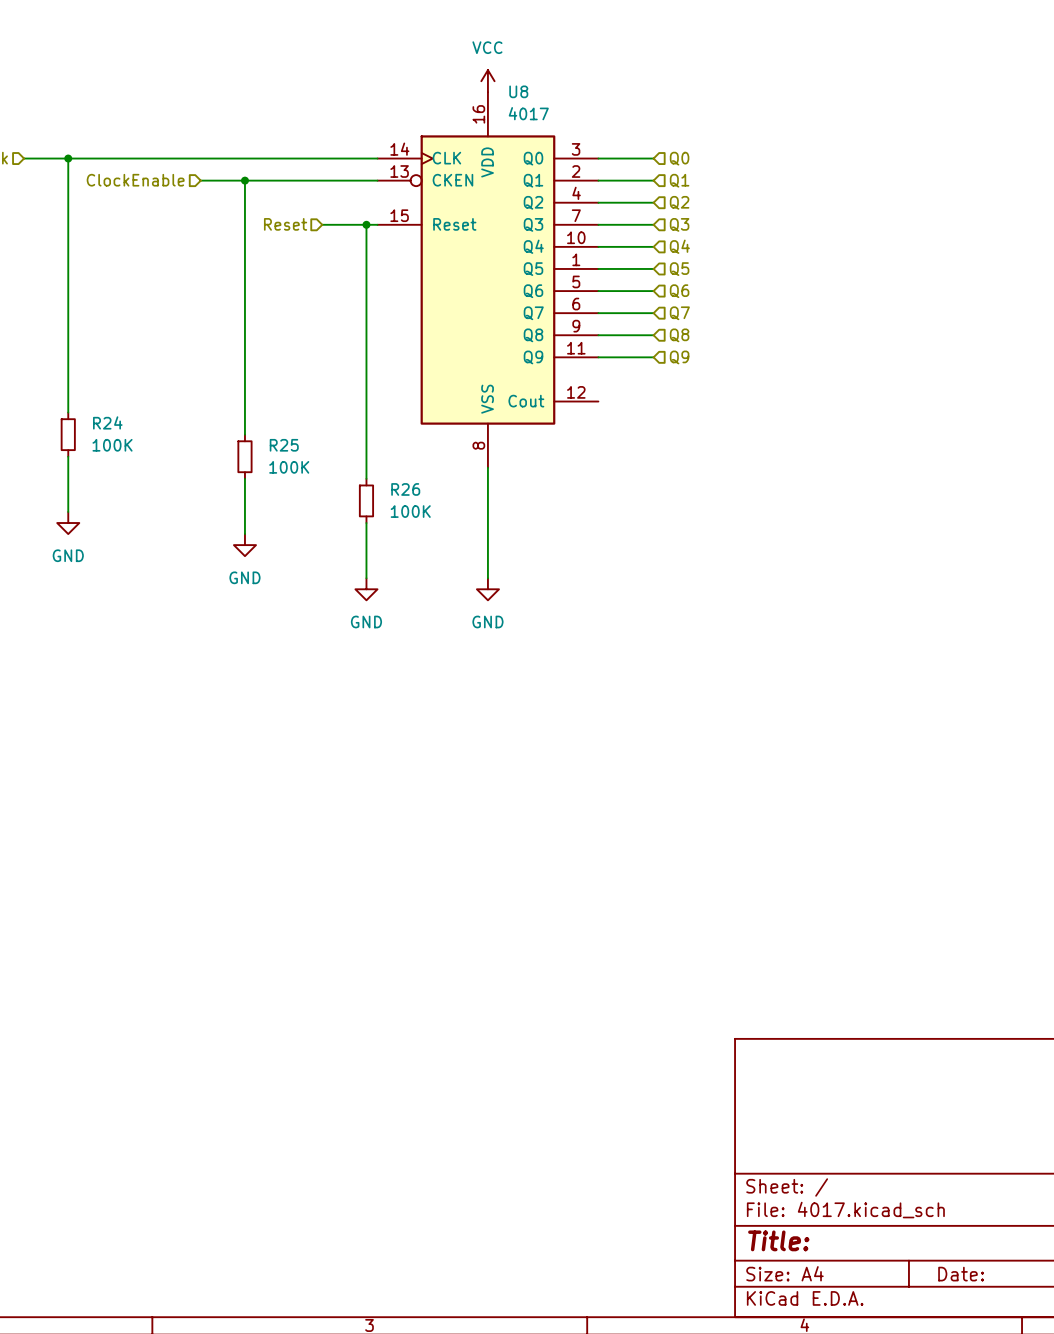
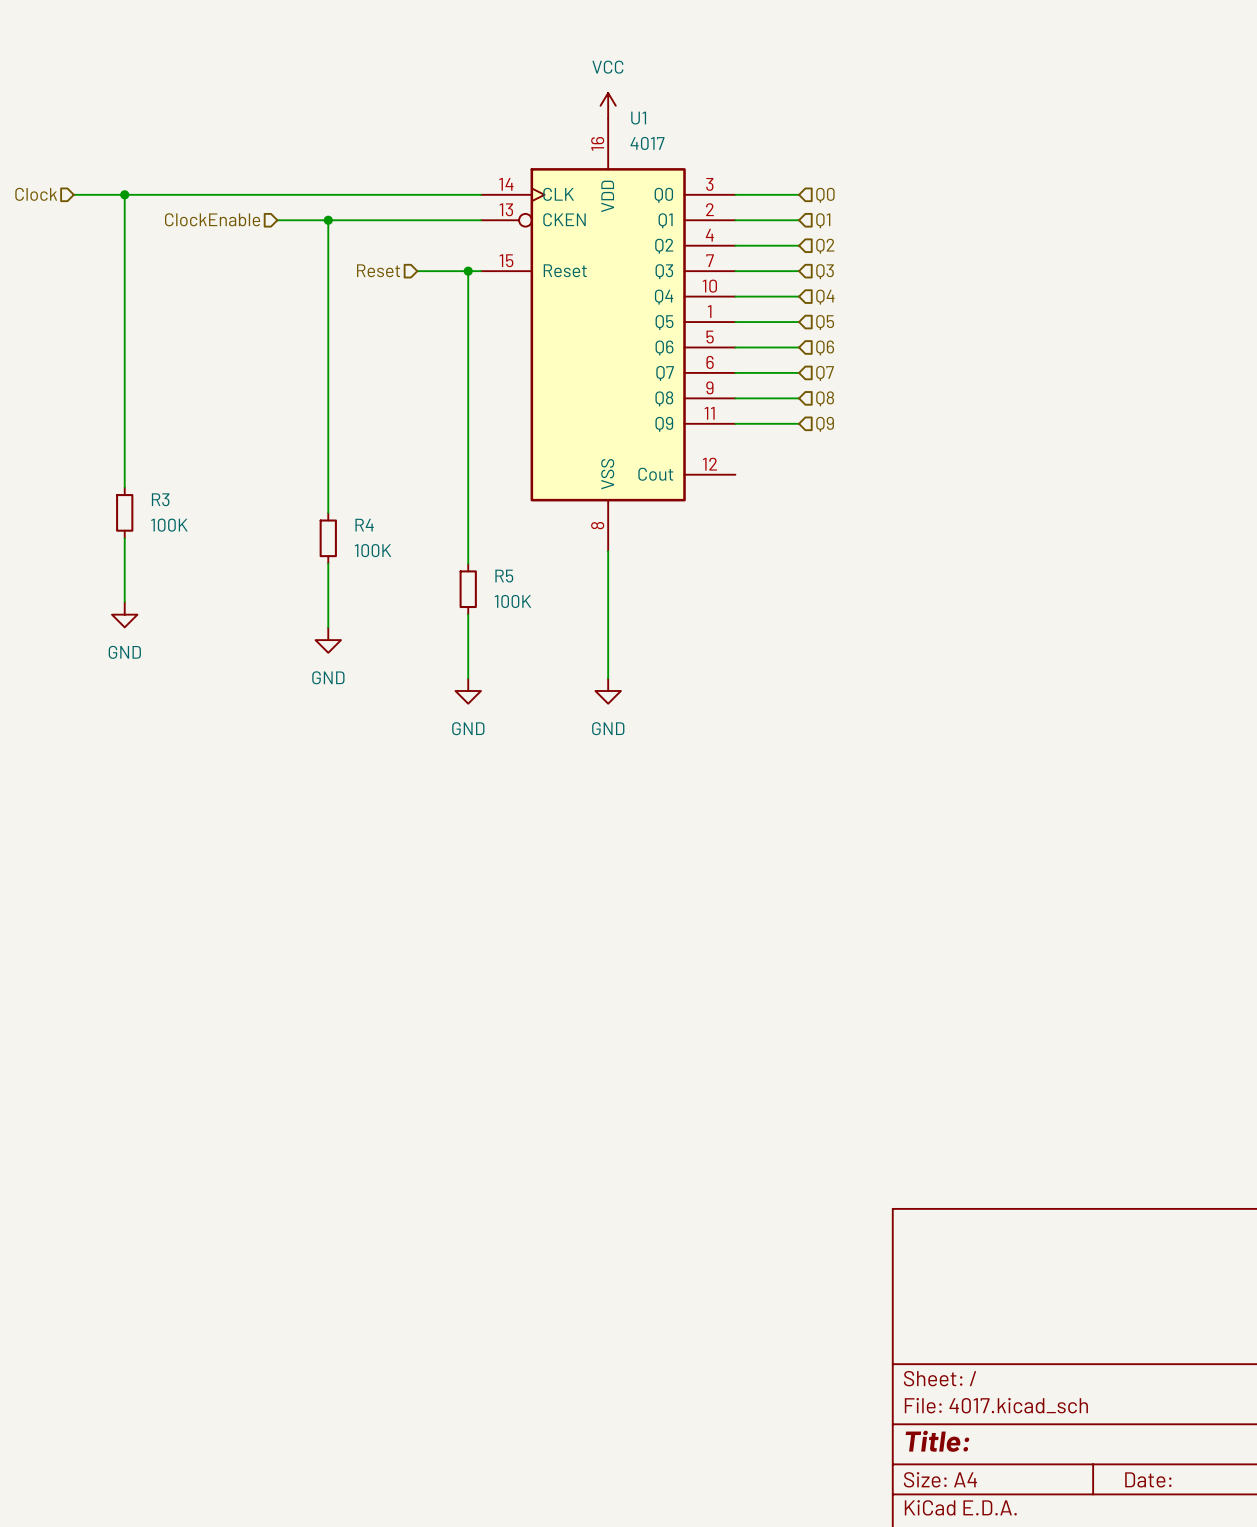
U8 name: U8 (518, 91) -> U1 (638, 118)
R24 name: R24 (107, 422) -> R3 (160, 499)
R25 name: R25 (284, 445) -> R4 (364, 525)
R26 name: R26 (405, 489) -> R5 (504, 576)

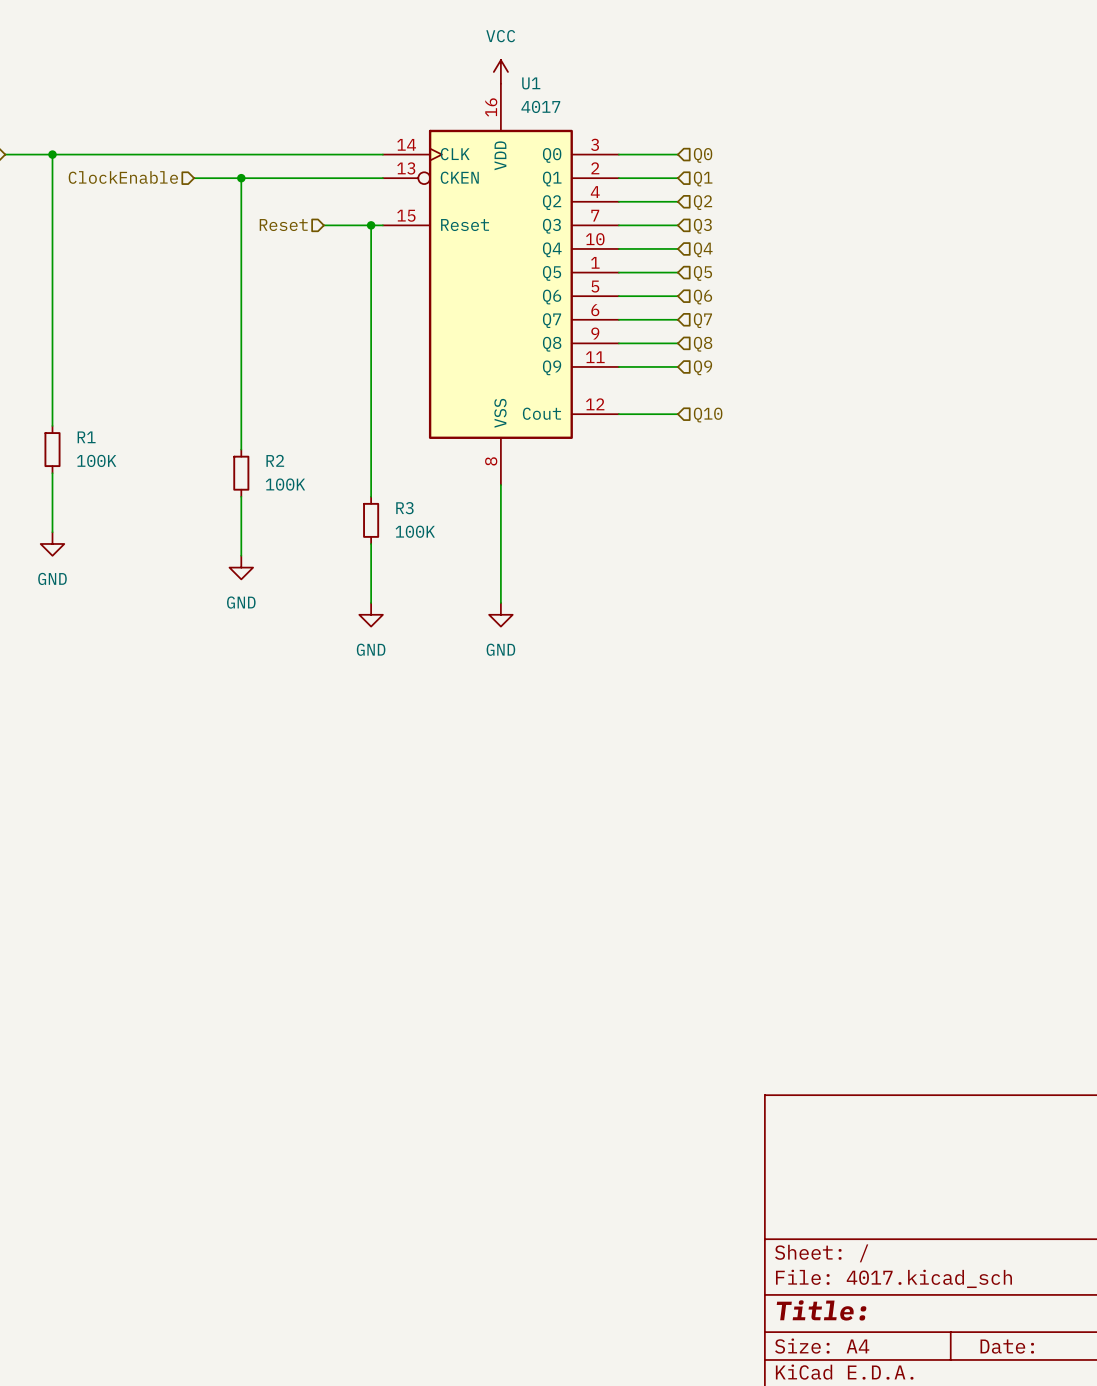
wire: none -> (618, 414) (677, 414)
hierarchical label: none -> Q10 (708, 415)
R3 name: R3 (160, 499) -> R1 (86, 437)
R4 name: R4 (364, 525) -> R2 (275, 460)
R5 name: R5 (504, 576) -> R3 (404, 508)

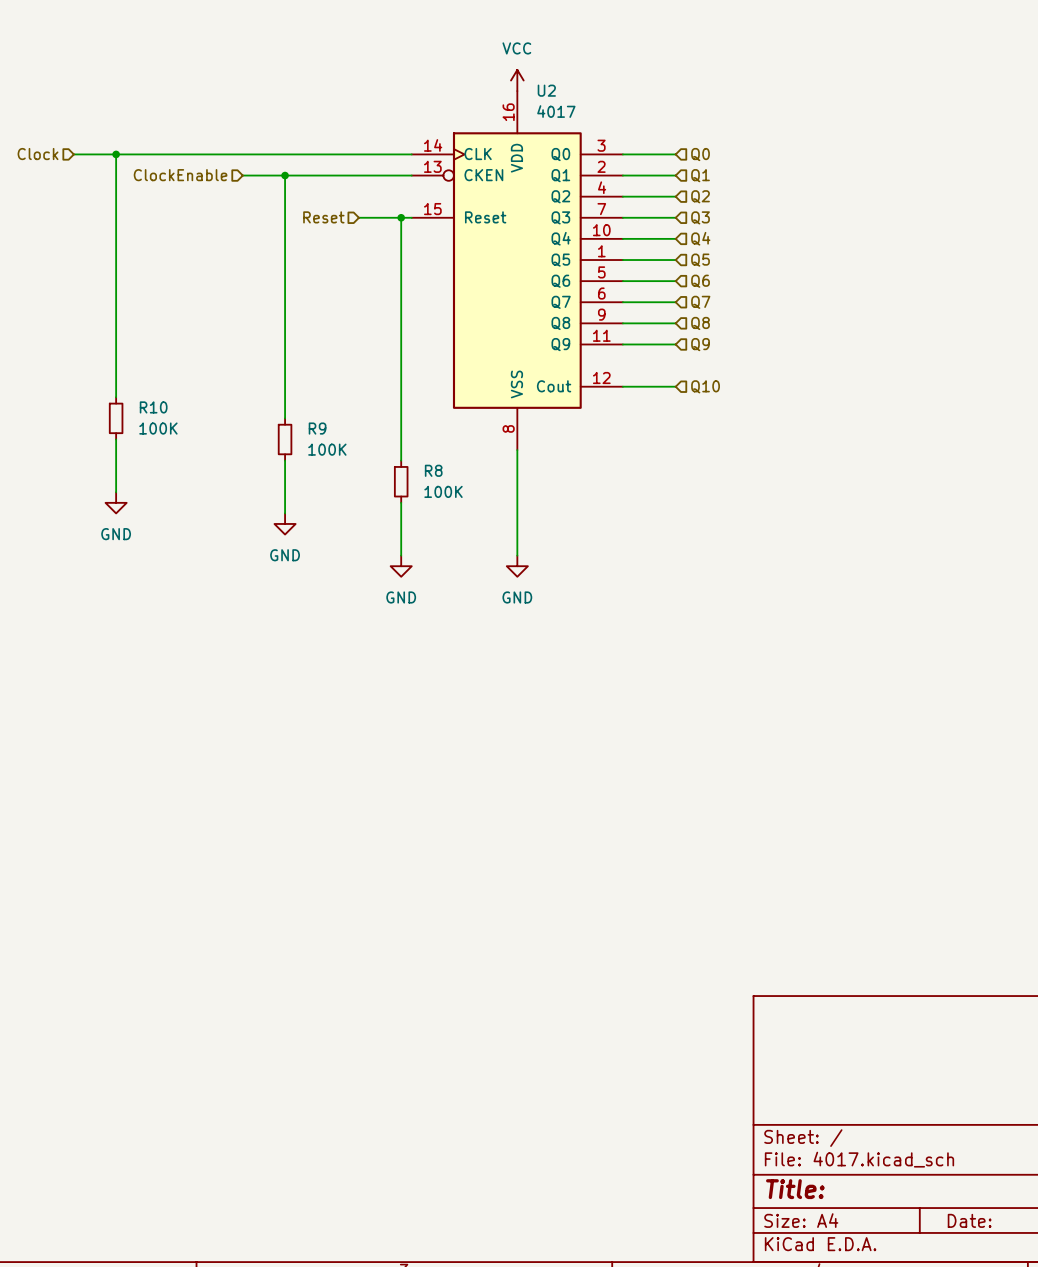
U1 name: U1 (531, 83) -> U2 (546, 90)
R1 name: R1 (86, 437) -> R10 (153, 407)
R2 name: R2 (275, 460) -> R9 (317, 428)
R3 name: R3 (404, 508) -> R8 (433, 470)

